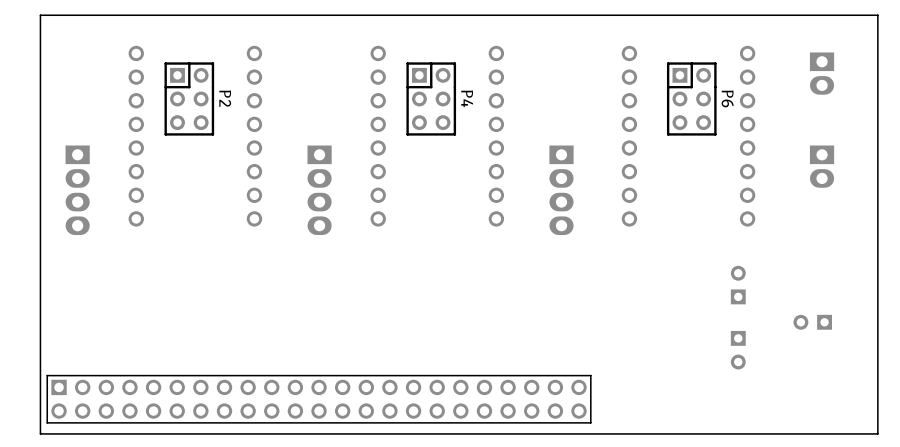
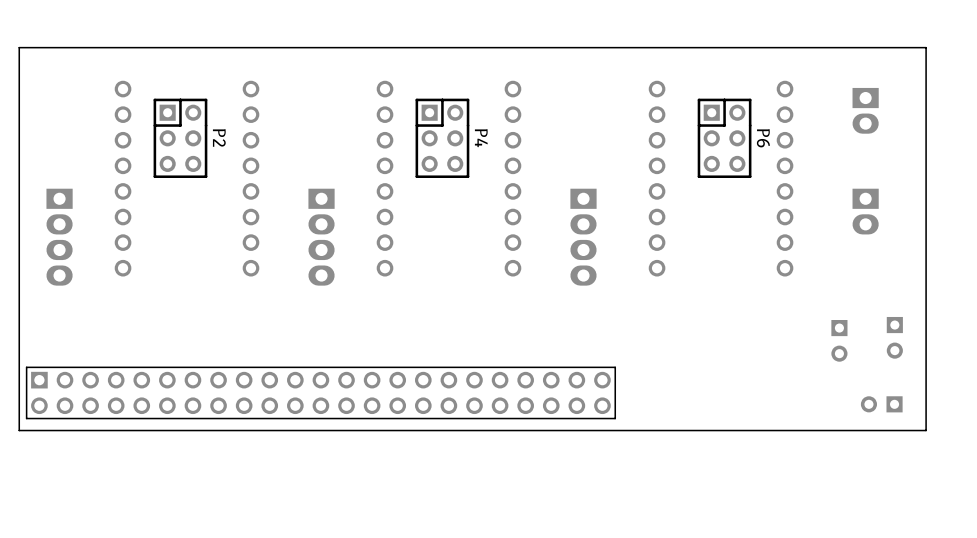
part: none -> (894, 337)
part: (738, 285) -> none
part: none -> (839, 340)
part: (812, 322) -> none
part: none -> (881, 404)
part: (738, 350) -> none
board edge: (877, 368) (877, 433) (40, 433) (40, 368) -> (926, 430) (19, 430)
part position: (319, 399) -> (320, 392)

